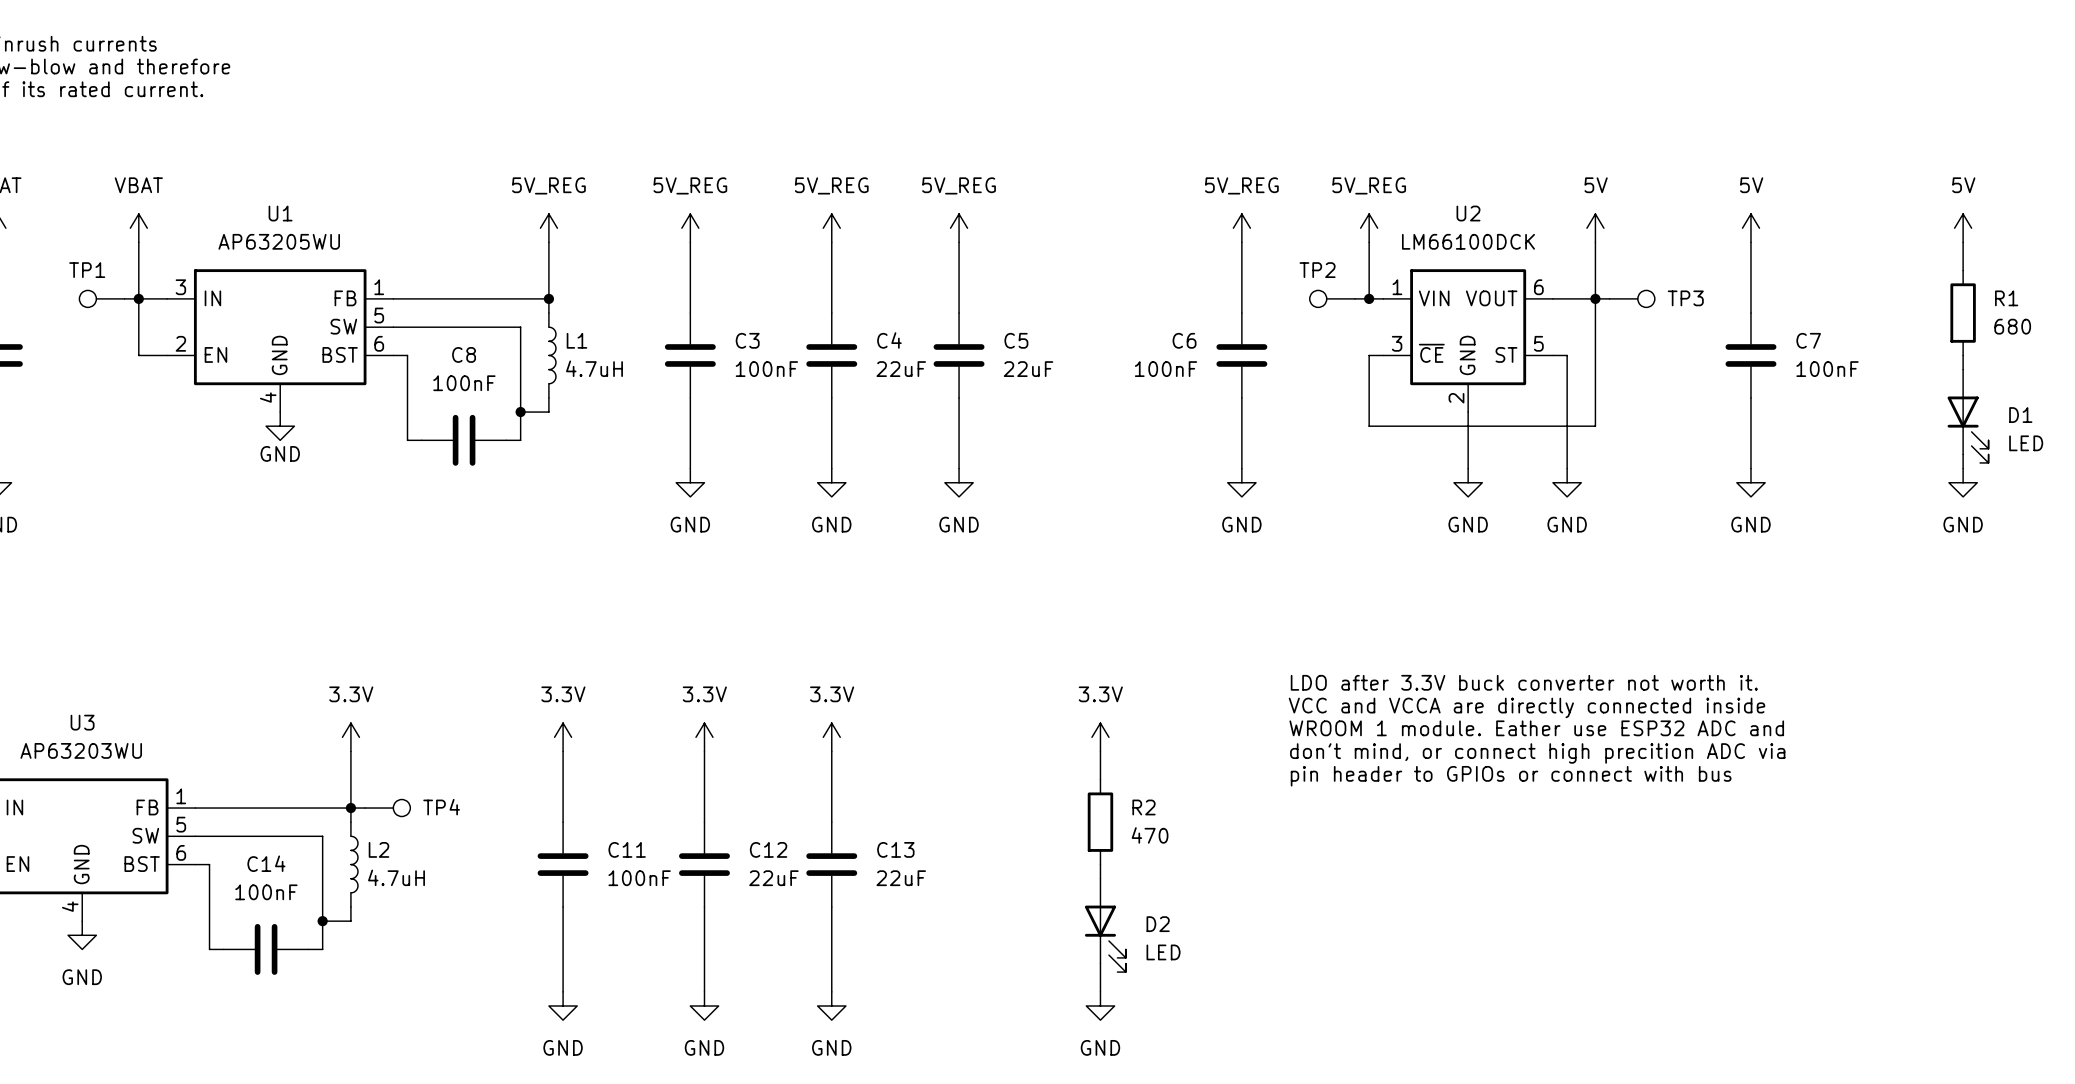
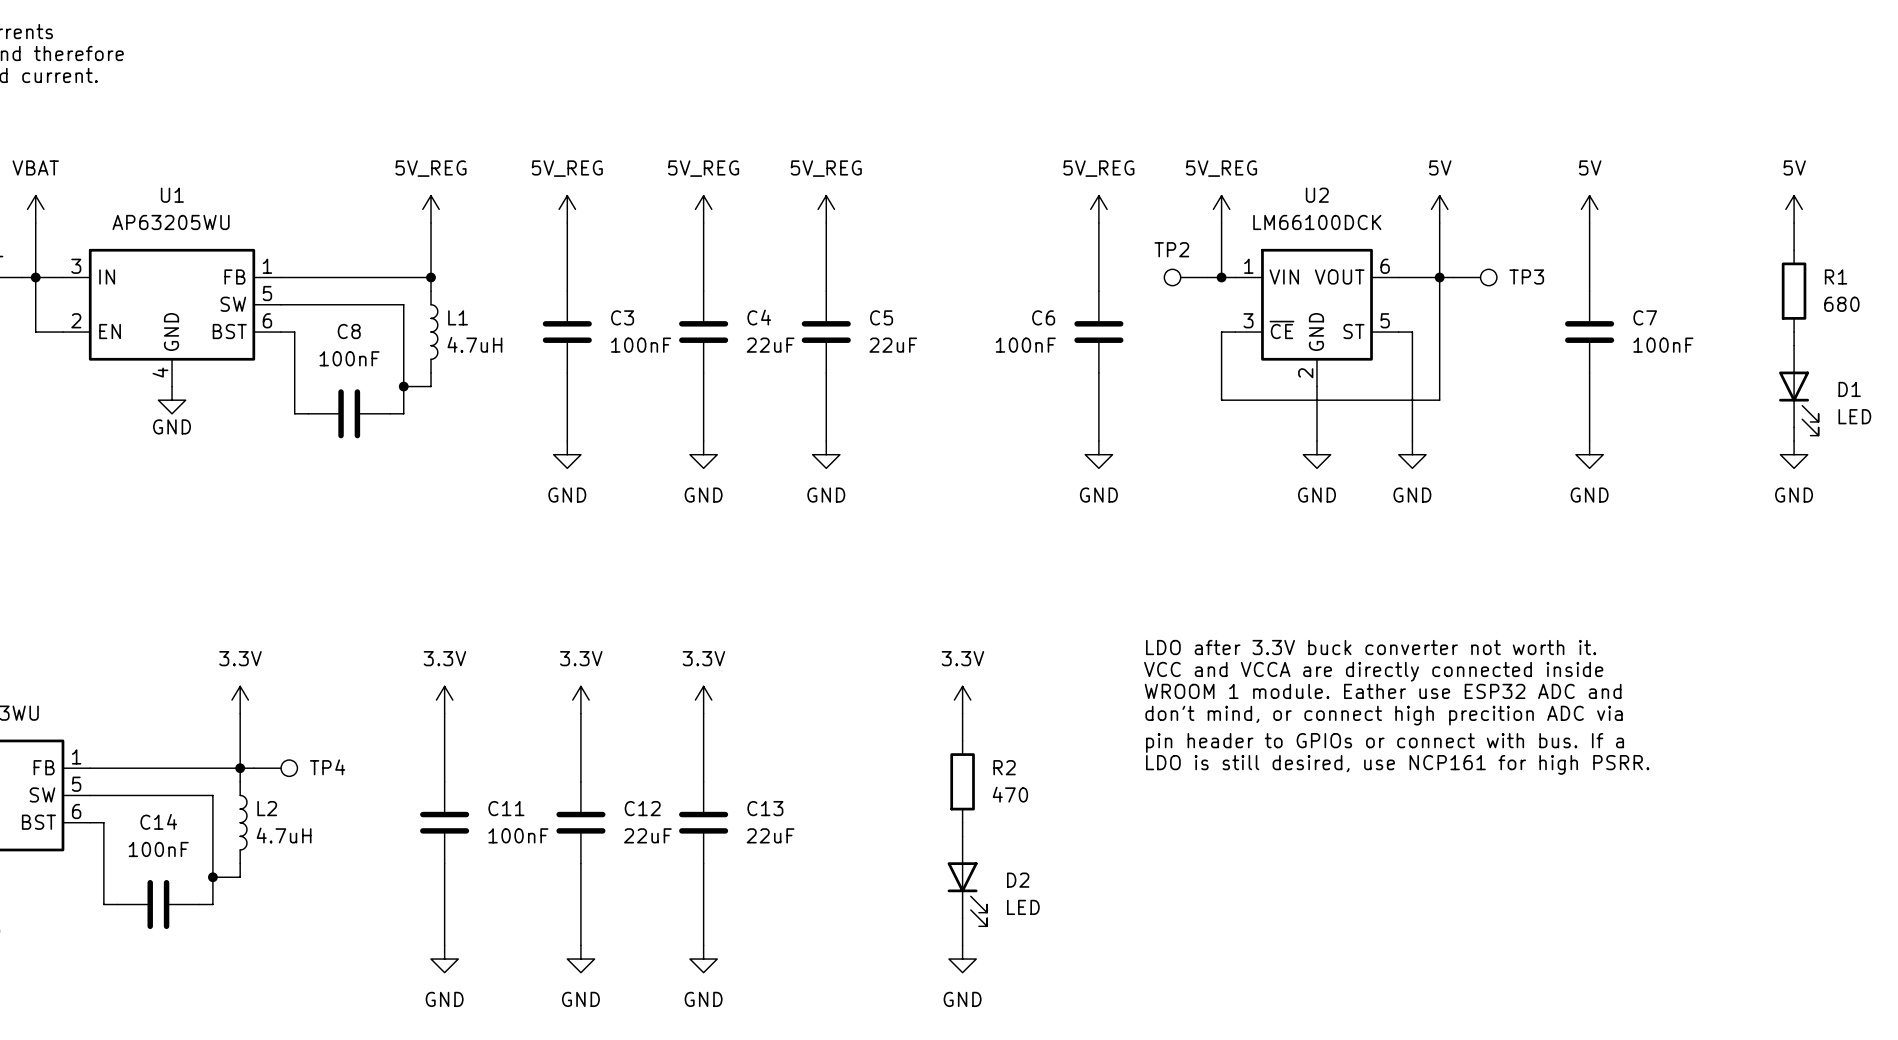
text: pin header to GPIOs or connect with bus (1511, 776) -> pin header to GPIOs or connect with bus. If a (1385, 742)
text: none -> LDO is still desired, use NCP161 for high PSRR. (1397, 764)

